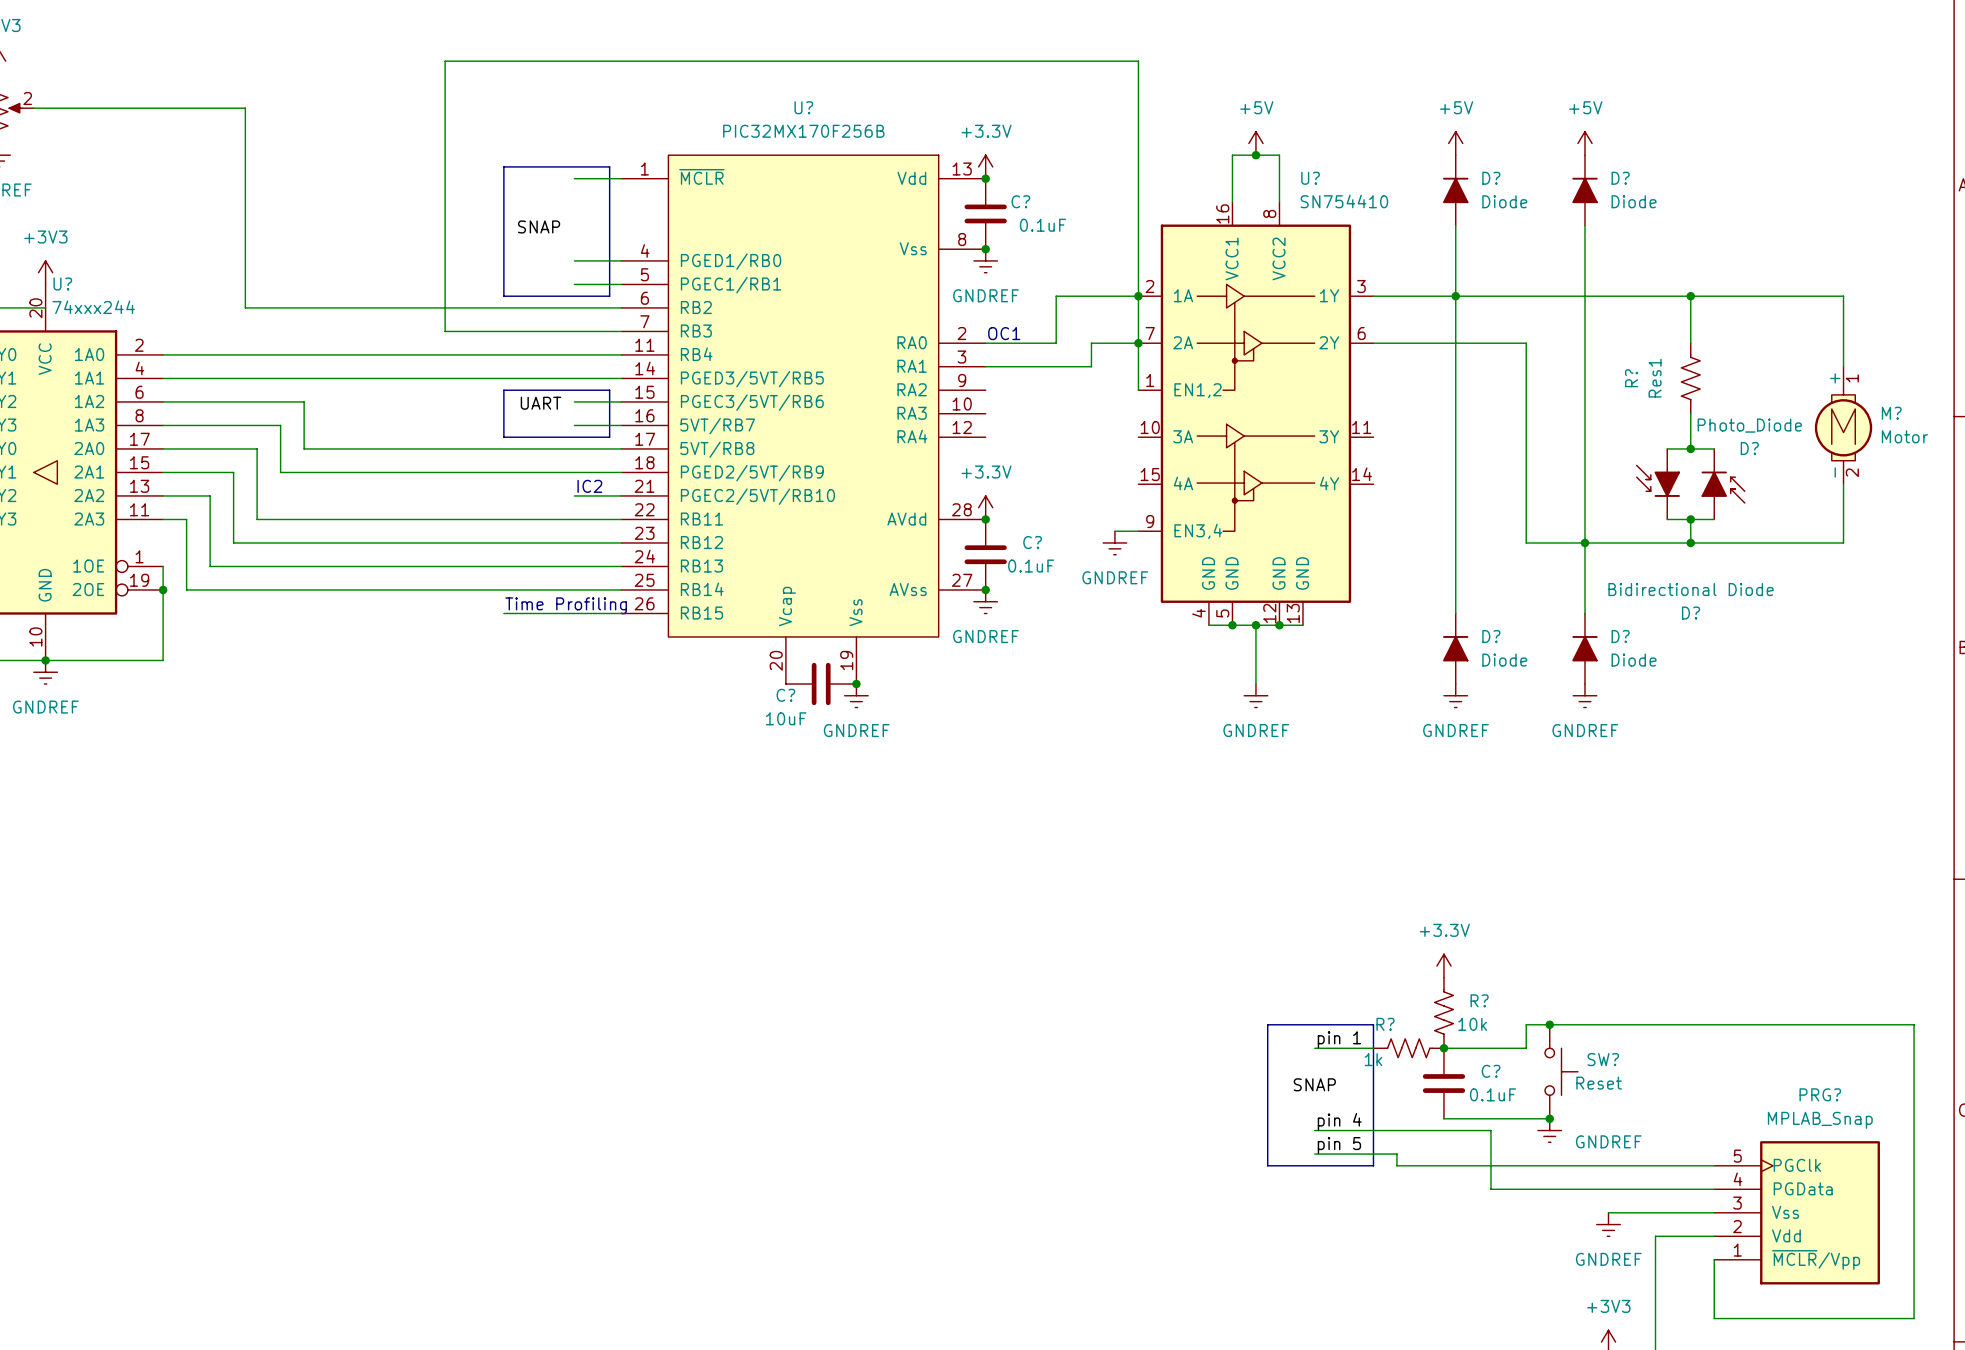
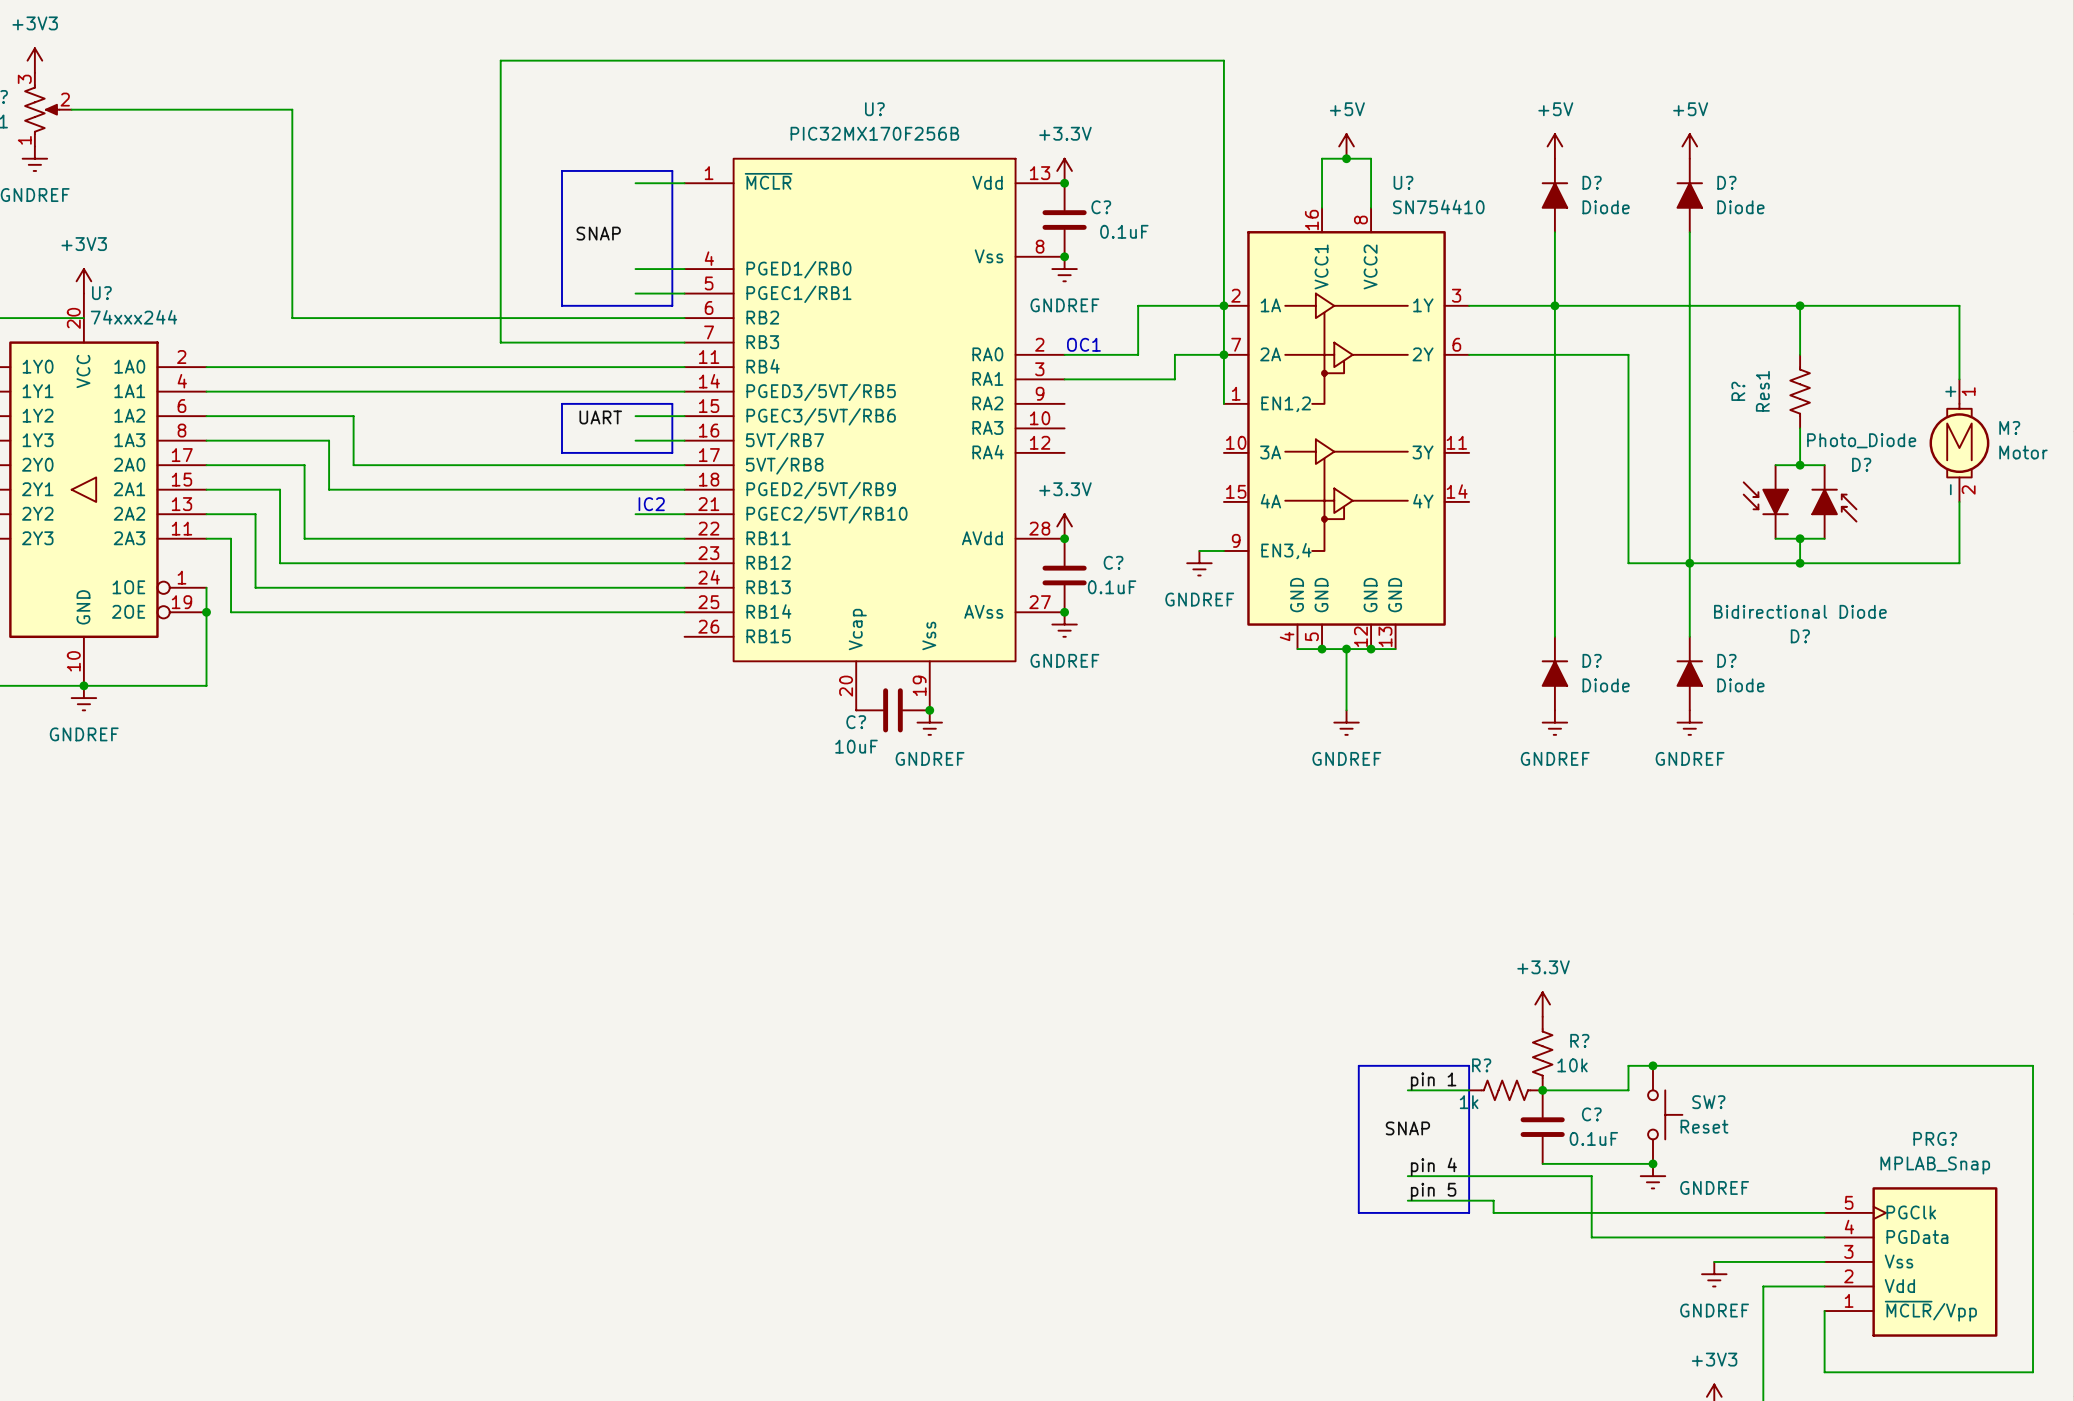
text: Time Profiling (566, 605) -> none
wire: (503, 613) (621, 613) -> none

